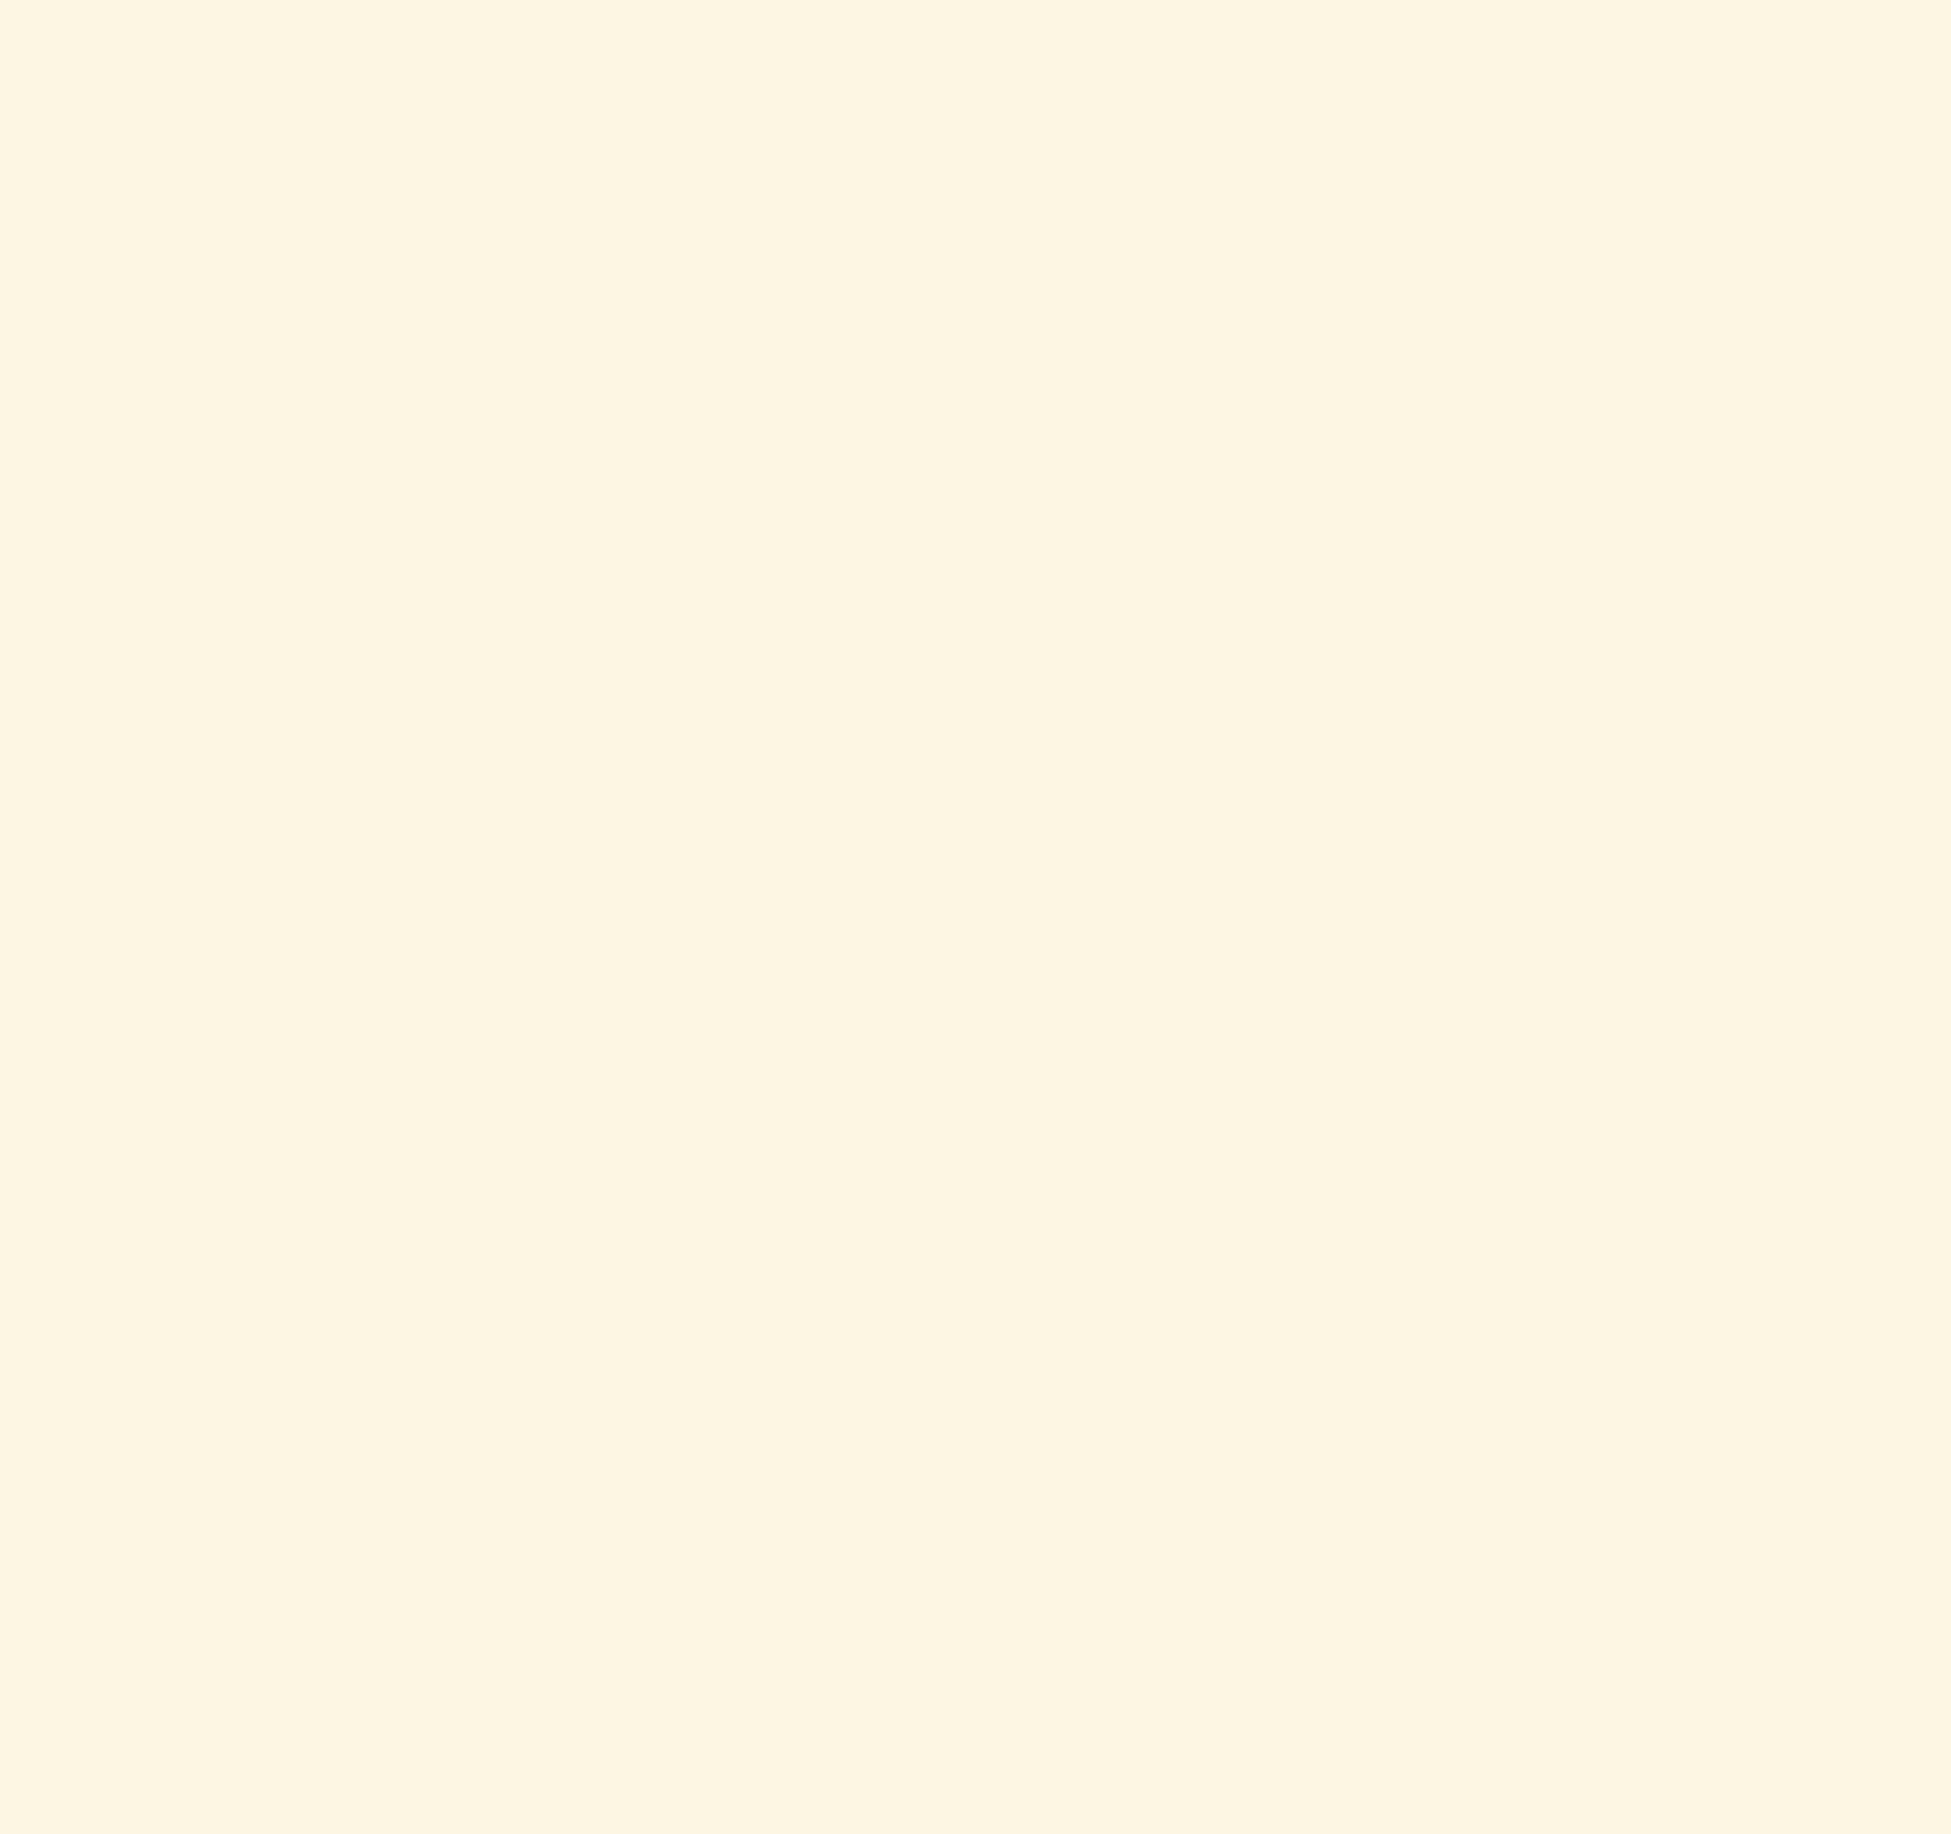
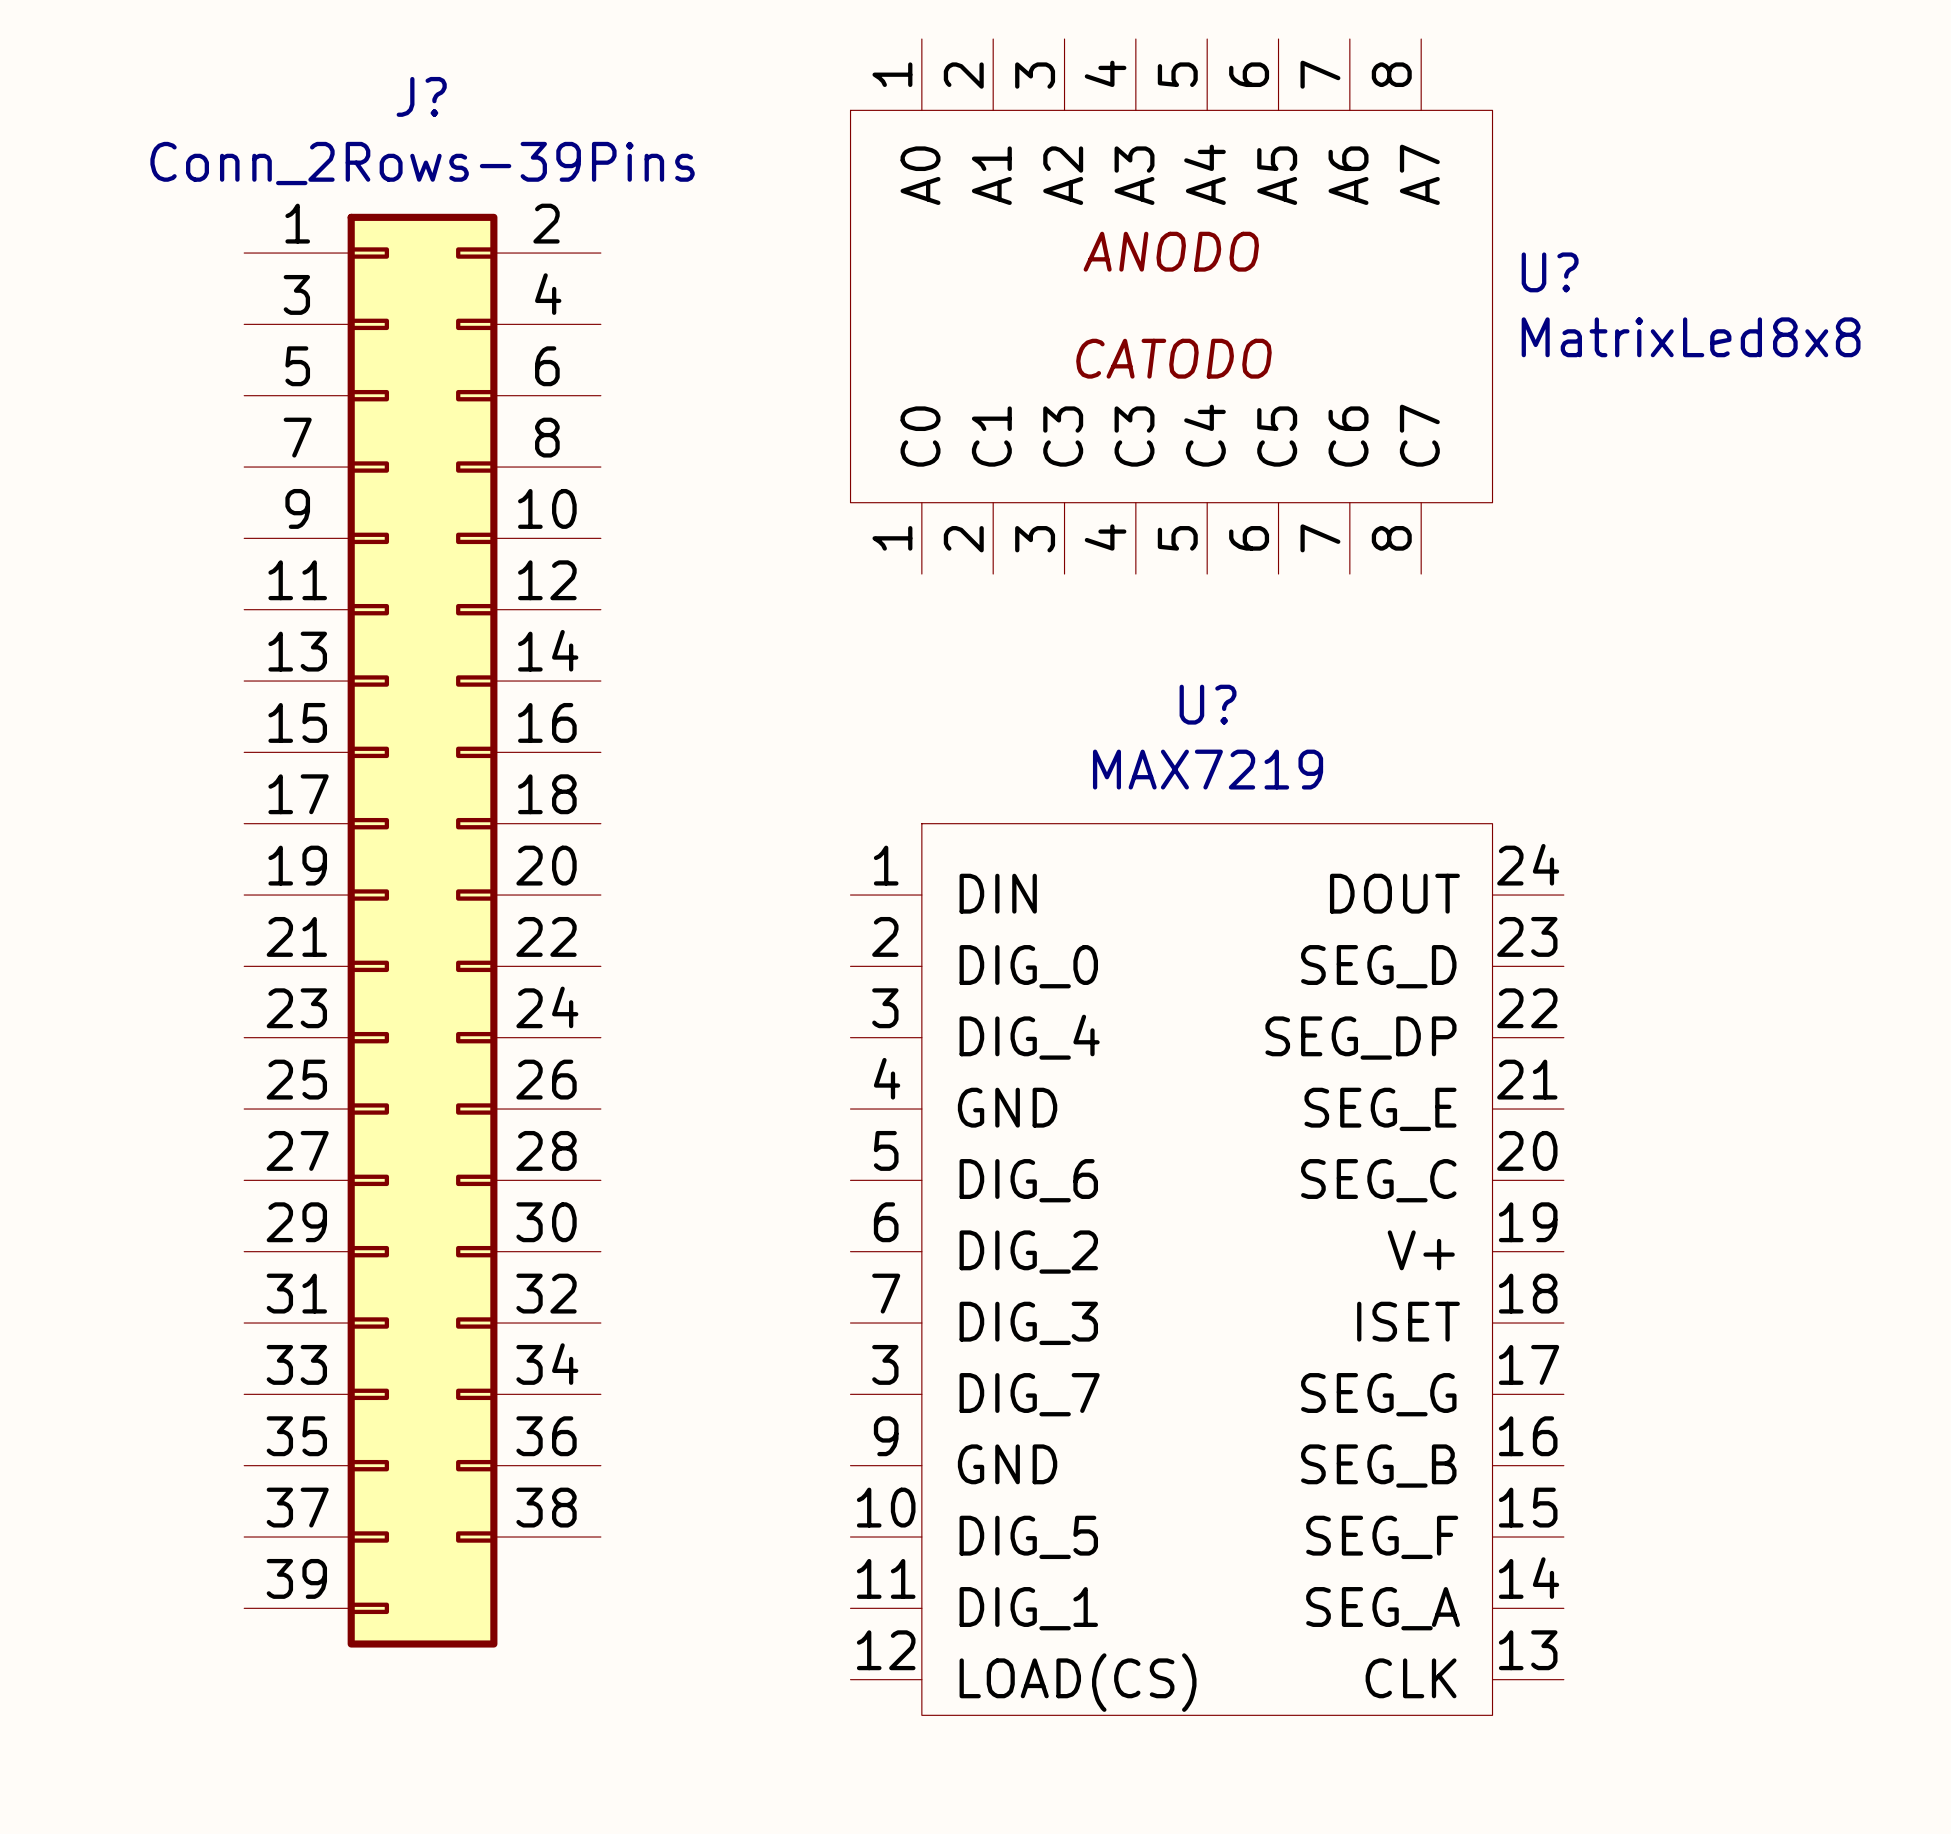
U?: none -> MatrixLed8x8 (1171, 306)
J?: none -> Conn_2Rows-39Pins (422, 930)
U?: none -> MAX7219 (1207, 1269)

